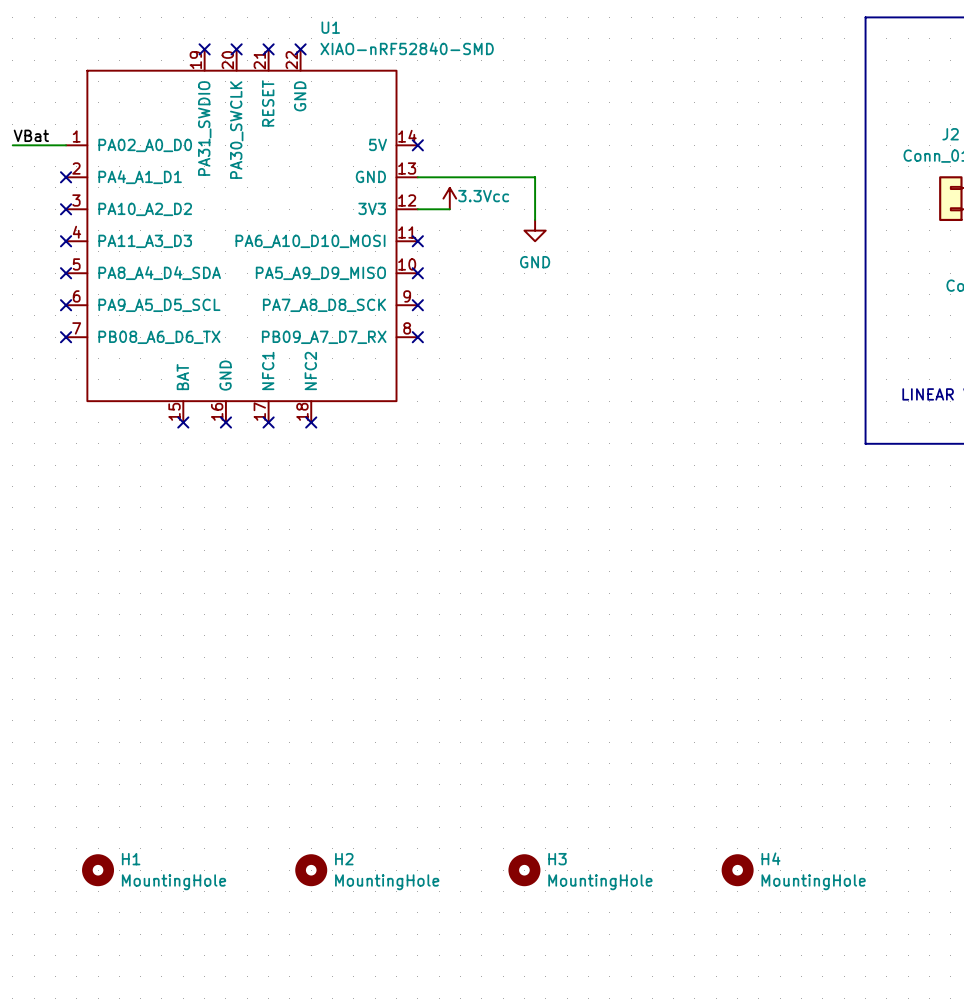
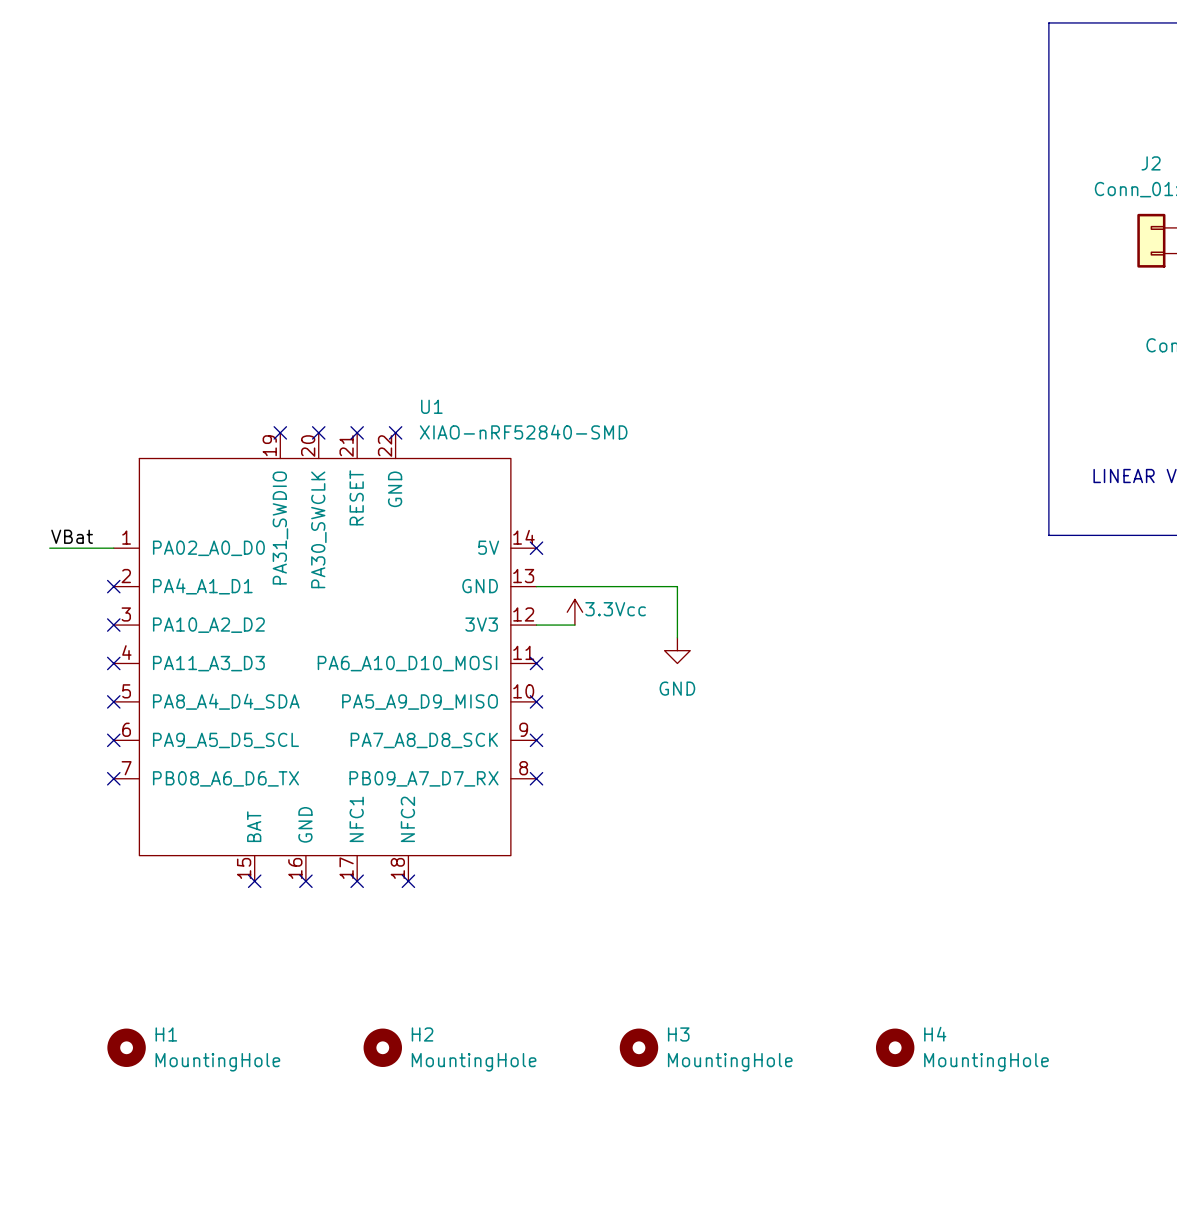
no-connect mark: (204, 49) -> none
no-connect mark: (236, 49) -> none
no-connect mark: (268, 49) -> none
no-connect mark: (300, 49) -> none
label: VBat (31, 135) -> none
wire: (12, 145) (66, 145) -> none
no-connect mark: (417, 145) -> none
no-connect mark: (66, 177) -> none
wire: (417, 177) (535, 177) (535, 219) -> none
power symbol: 3.3Vcc (449, 198) -> none
no-connect mark: (66, 209) -> none
wire: (417, 209) (449, 209) -> none
power symbol: GND (535, 230) -> none
U1 position: (241, 235) -> (325, 657)
no-connect mark: (66, 241) -> none
no-connect mark: (417, 241) -> none
no-connect mark: (66, 273) -> none
no-connect mark: (417, 273) -> none
no-connect mark: (66, 305) -> none
no-connect mark: (417, 305) -> none
no-connect mark: (66, 337) -> none
no-connect mark: (417, 337) -> none
no-connect mark: none -> (280, 432)
no-connect mark: none -> (318, 432)
no-connect mark: none -> (357, 432)
no-connect mark: none -> (395, 432)
no-connect mark: (183, 422) -> none
no-connect mark: (225, 422) -> none
no-connect mark: (268, 422) -> none
no-connect mark: (311, 422) -> none
label: none -> VBat (72, 536)
wire: none -> (49, 548) (113, 548)
no-connect mark: none -> (536, 548)
no-connect mark: none -> (113, 586)
wire: none -> (536, 586) (677, 586) (677, 637)
power symbol: none -> 3.3Vcc (574, 612)
no-connect mark: none -> (113, 625)
wire: none -> (536, 625) (574, 625)
power symbol: none -> GND (677, 650)
no-connect mark: none -> (113, 663)
no-connect mark: none -> (536, 663)
no-connect mark: none -> (113, 701)
no-connect mark: none -> (536, 701)
no-connect mark: none -> (113, 740)
no-connect mark: none -> (536, 740)
no-connect mark: none -> (113, 778)
no-connect mark: none -> (536, 778)
no-connect mark: none -> (254, 881)
no-connect mark: none -> (305, 881)
no-connect mark: none -> (357, 881)
no-connect mark: none -> (408, 881)

